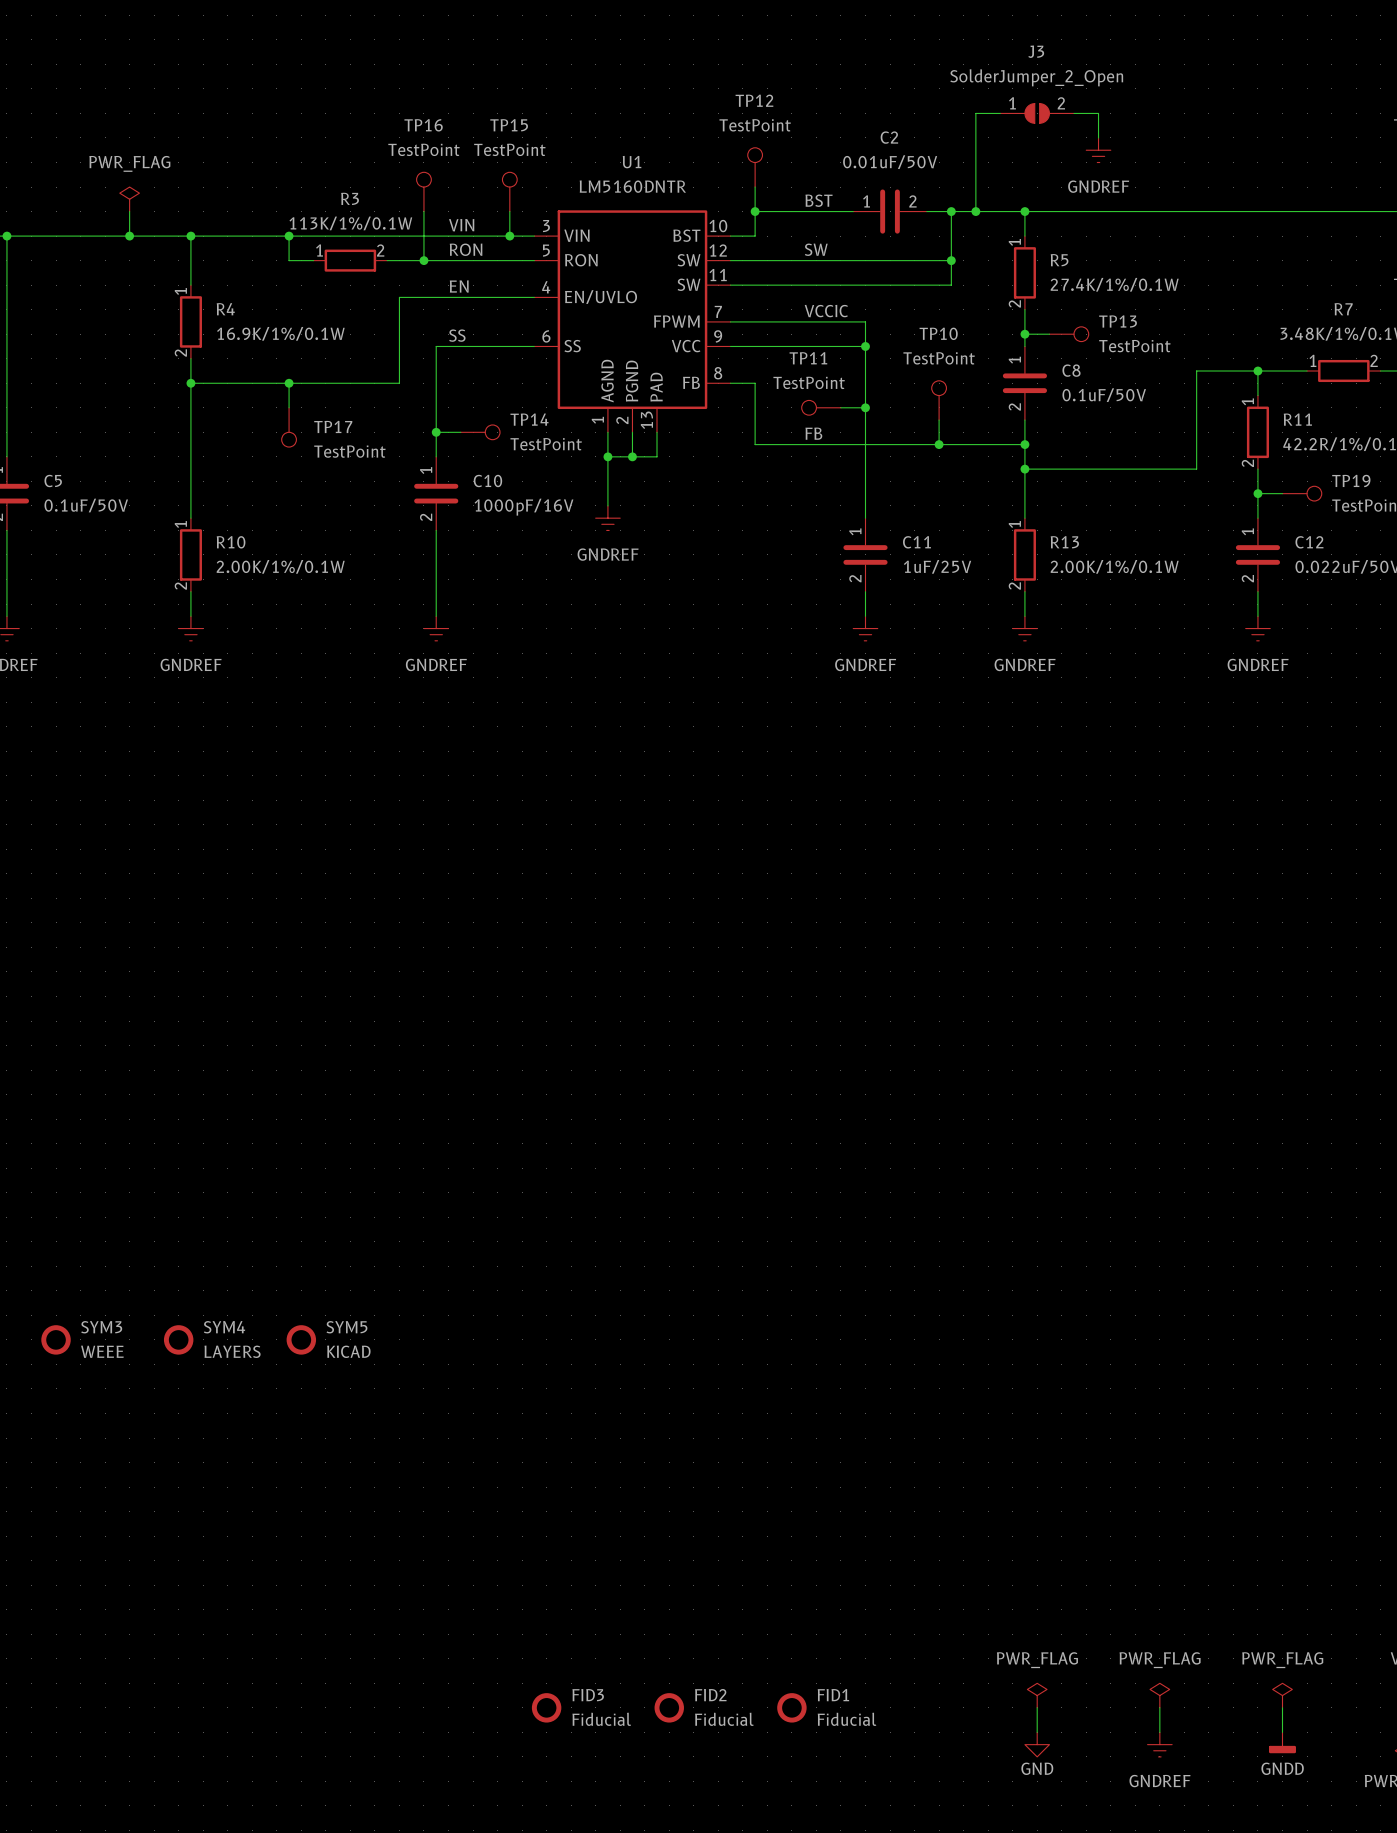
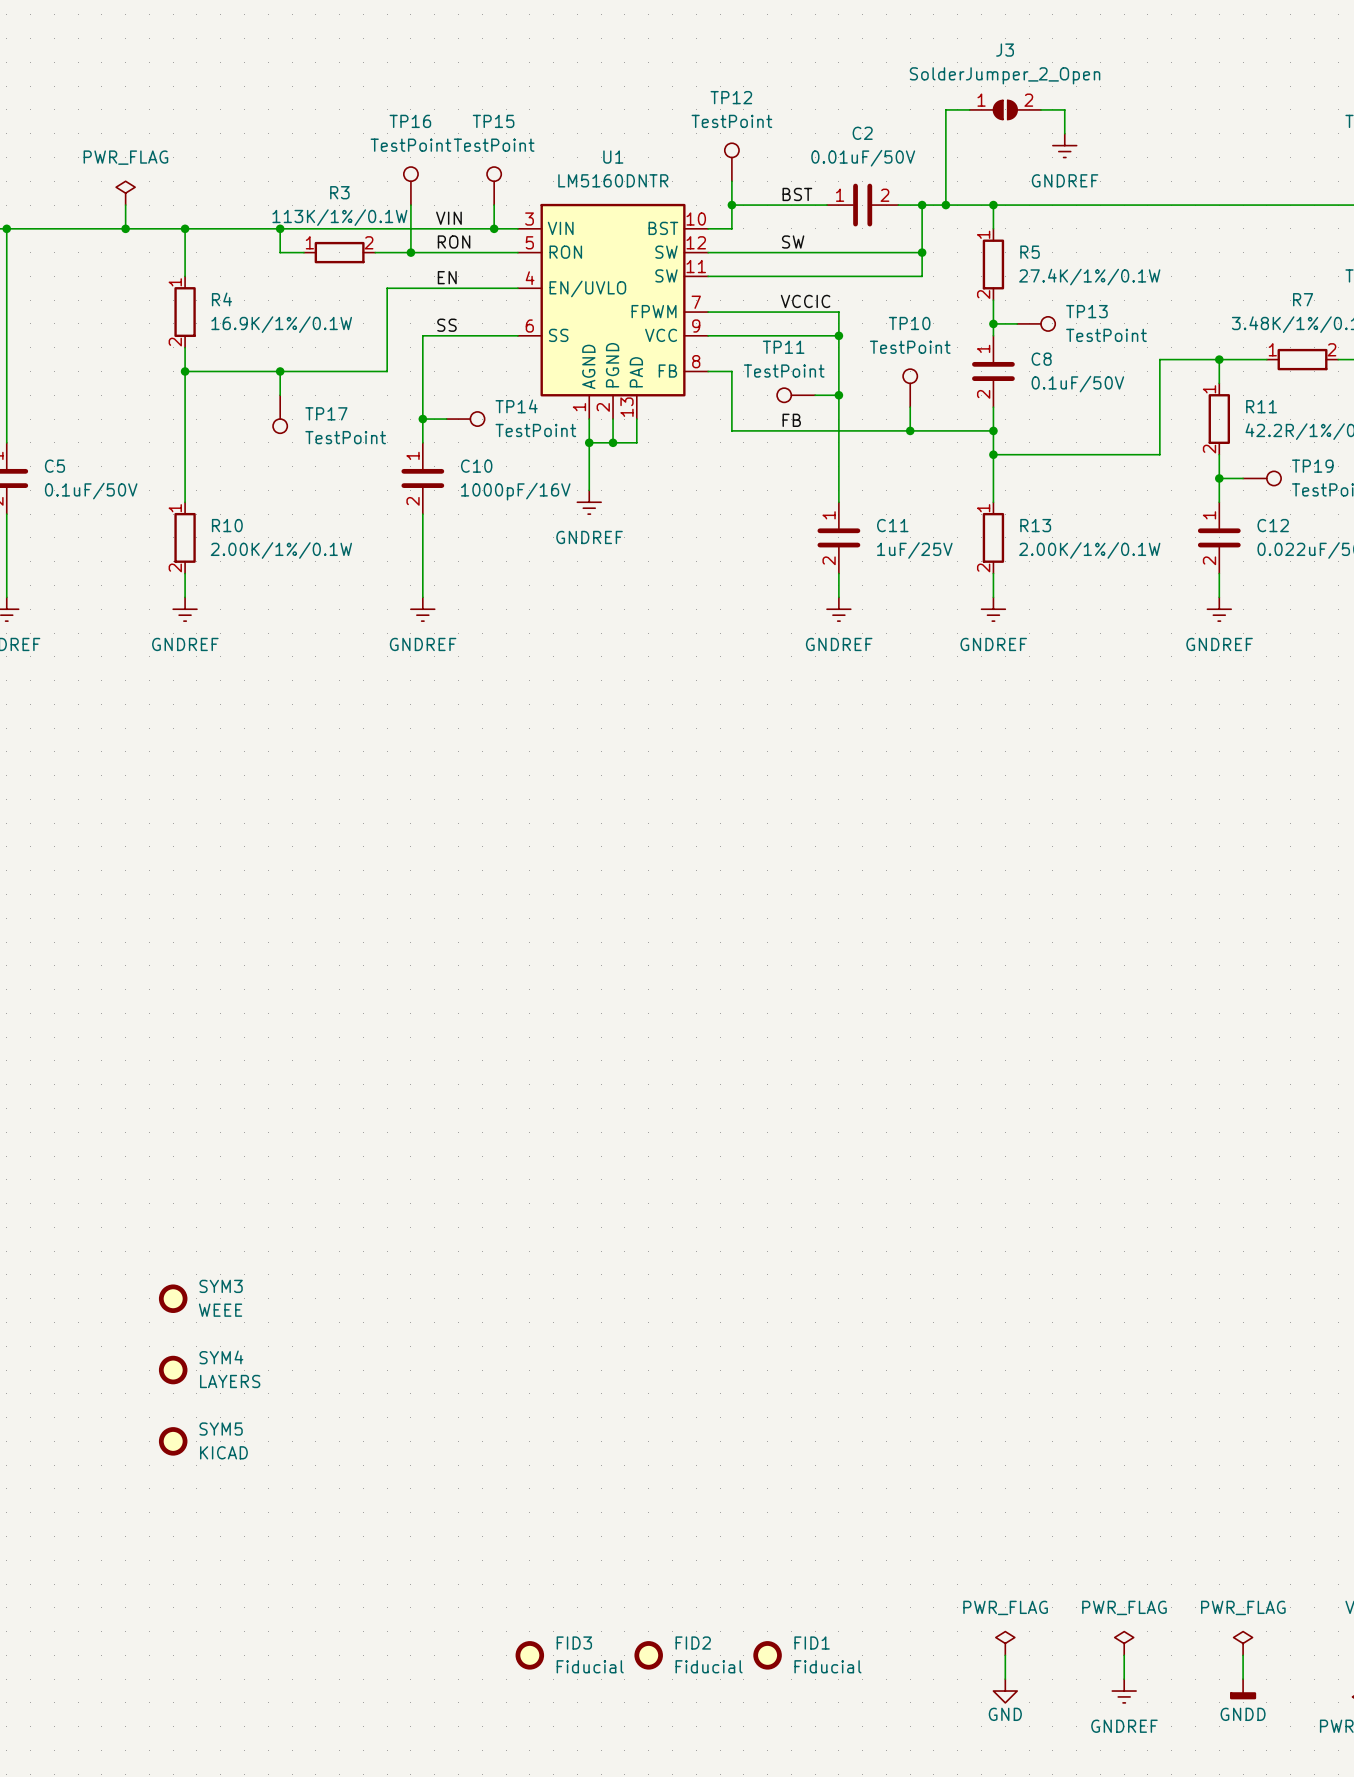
SYM4 name: SYM4 (224, 1327) -> SYM3 (221, 1286)
SYM3: WEEE (56, 1339) -> none
SYM5 position: (301, 1339) -> (173, 1441)
SYM4 value: LAYERS (232, 1351) -> WEEE (220, 1310)
SYM4: none -> LAYERS (173, 1370)

